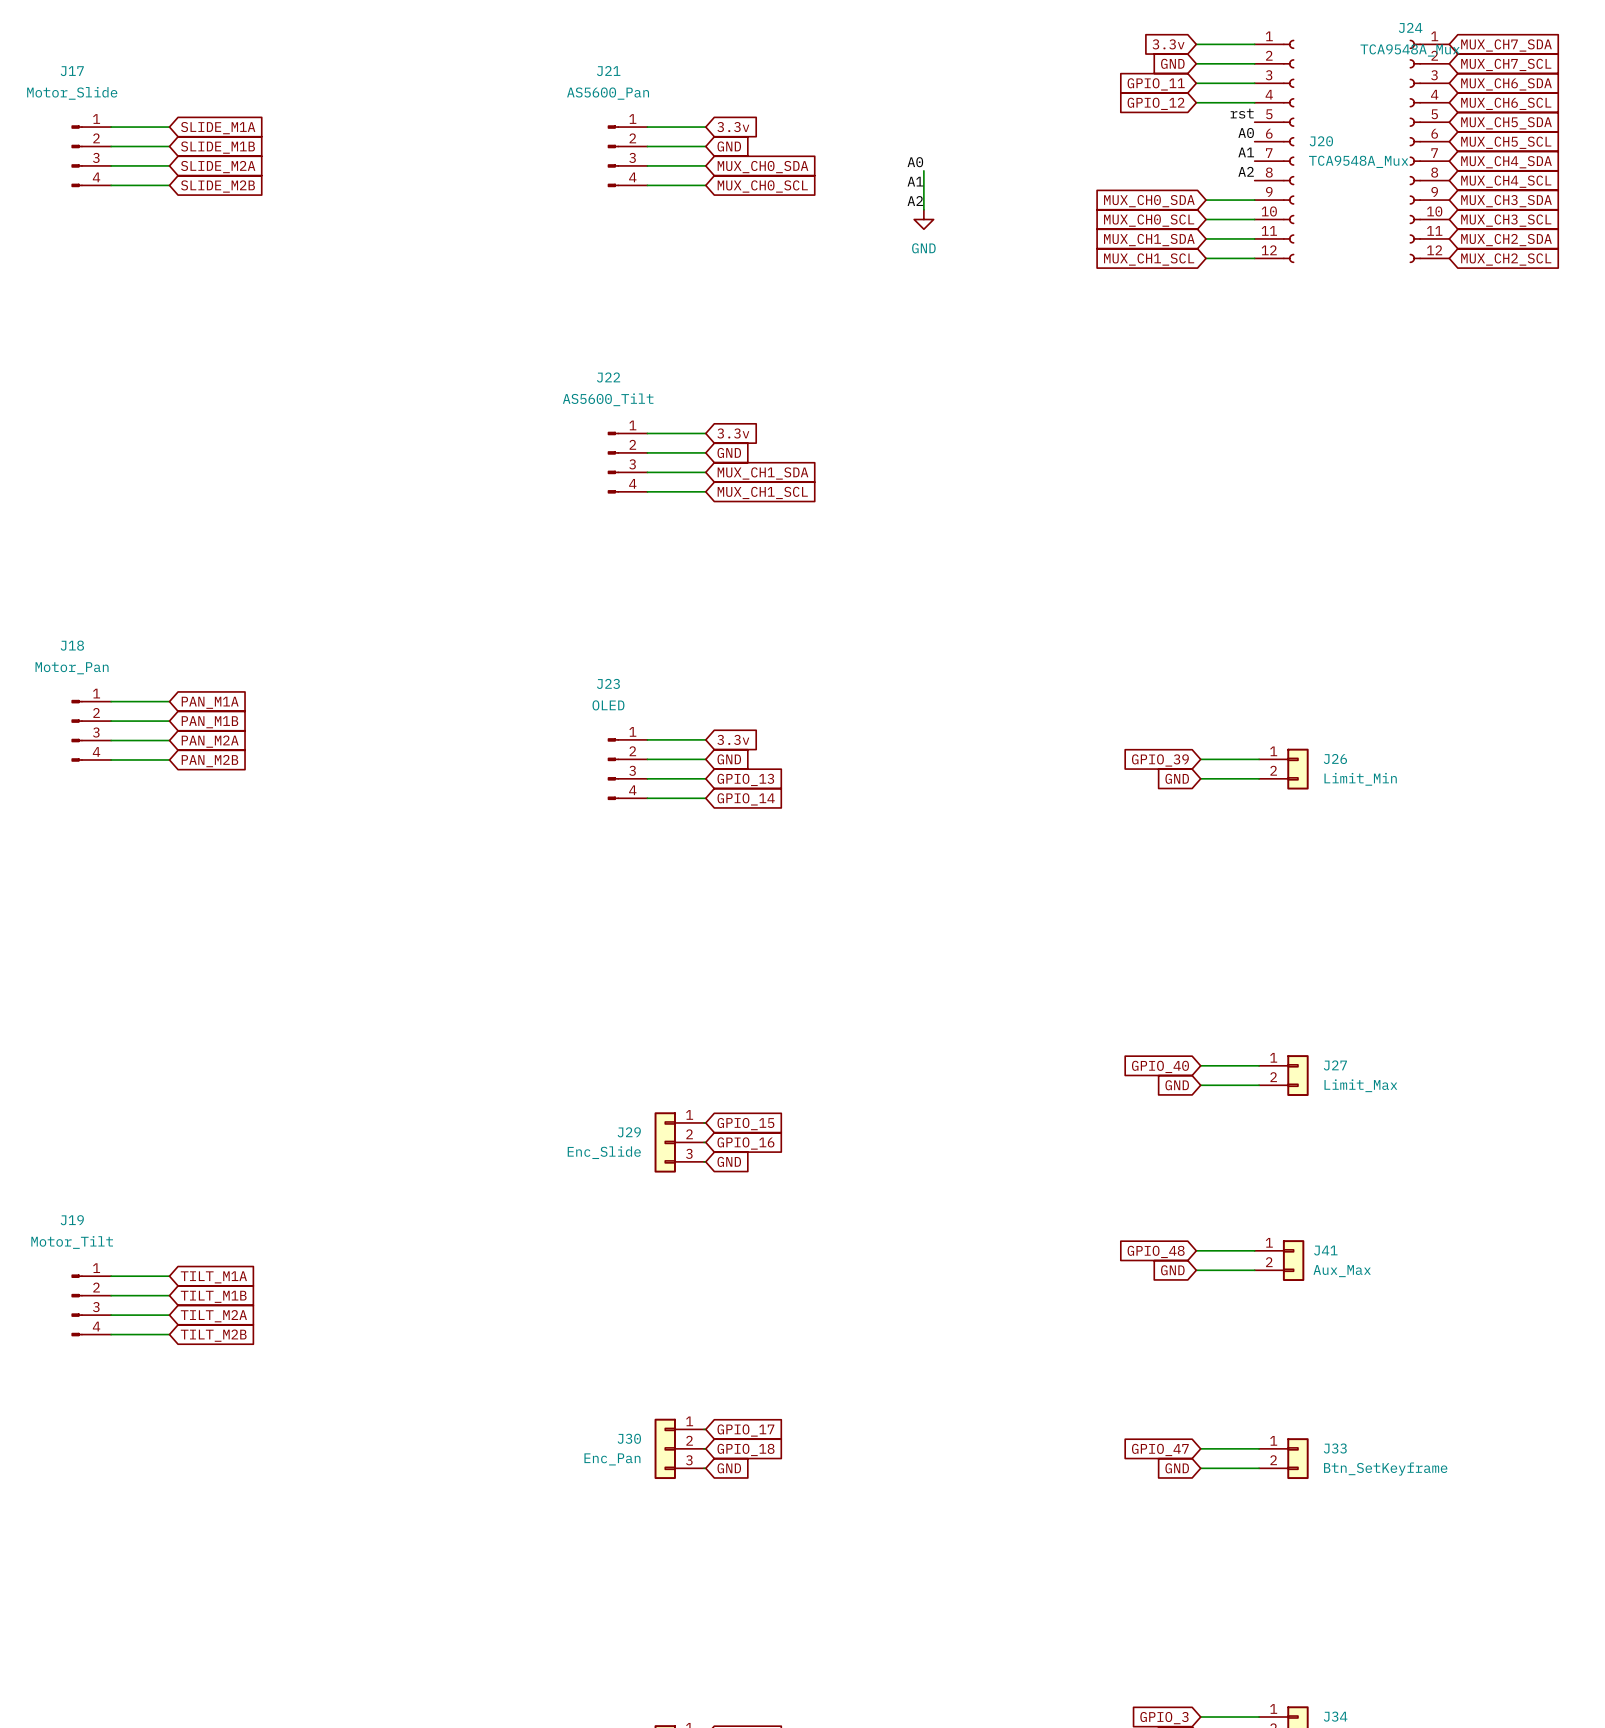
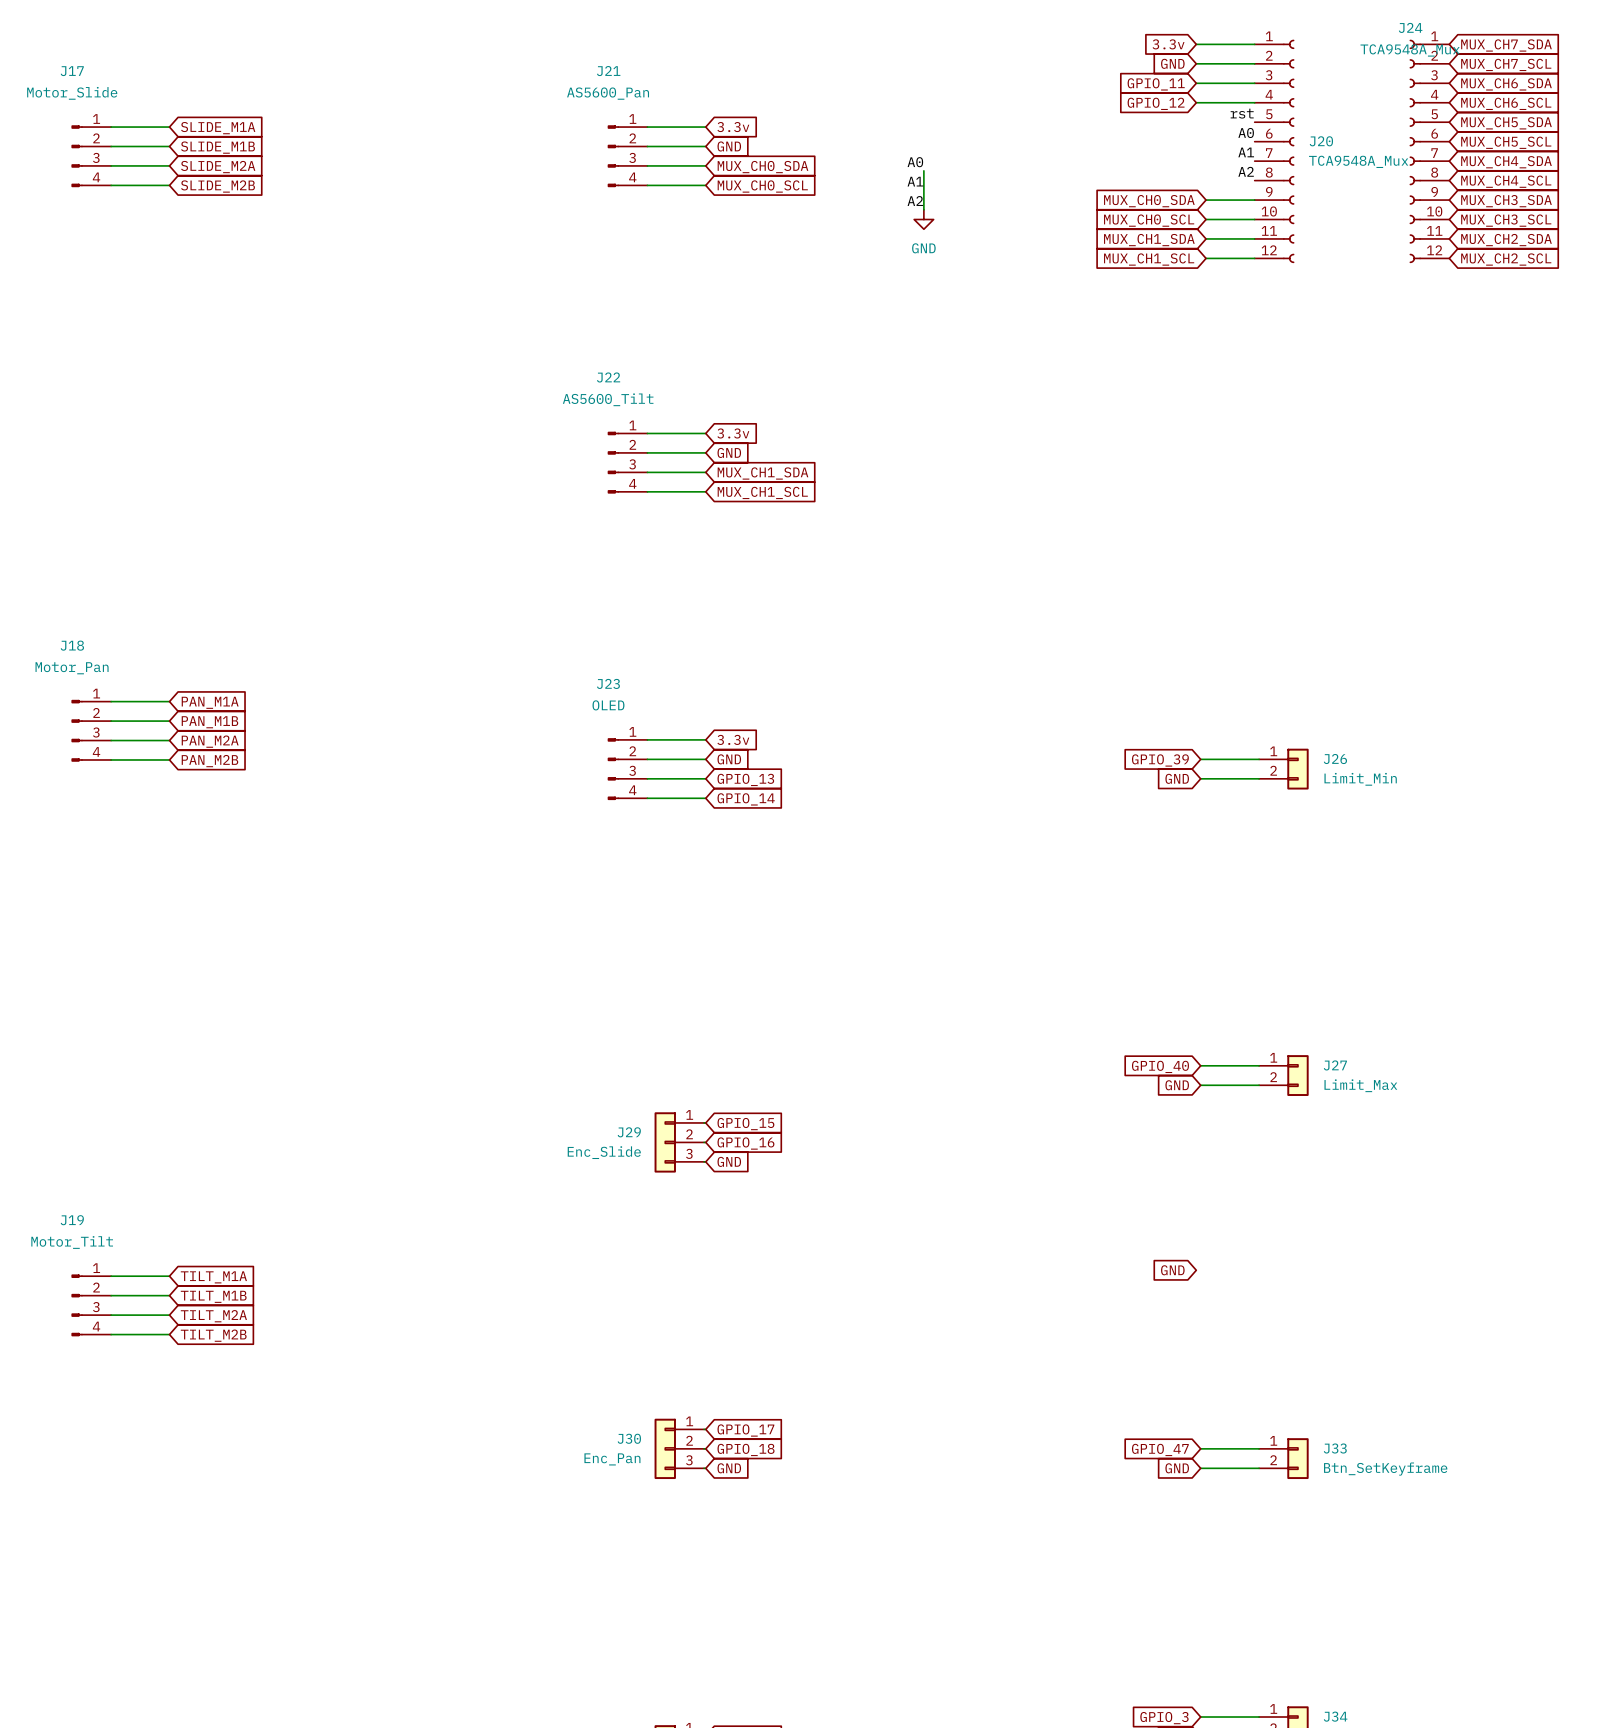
wire: (1196, 1250) (1254, 1250) -> none
global label: GPIO_48 (1156, 1251) -> none
J41: Aux_Max (1279, 1260) -> none
wire: (1196, 1270) (1254, 1270) -> none

